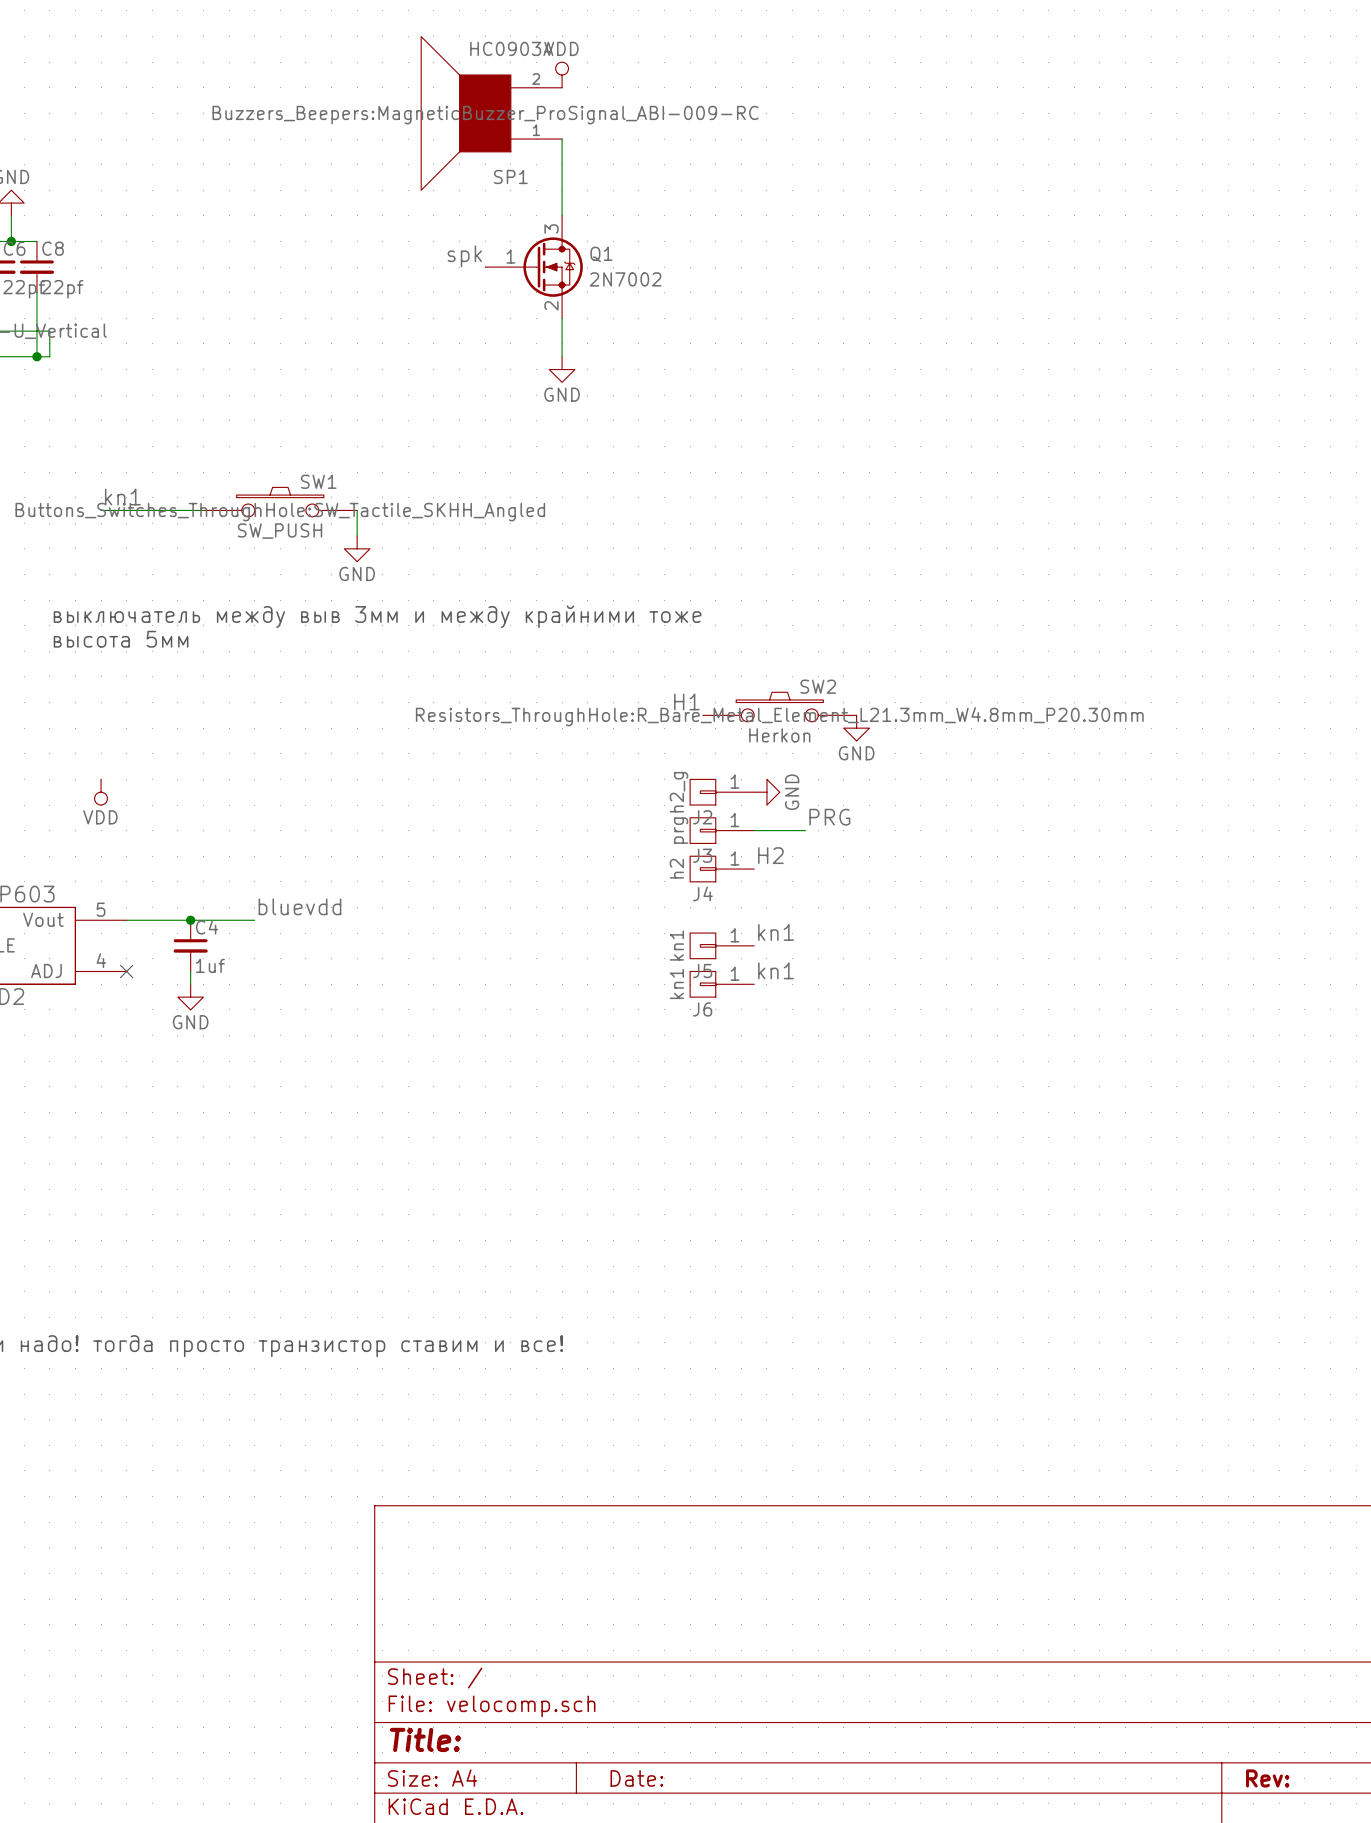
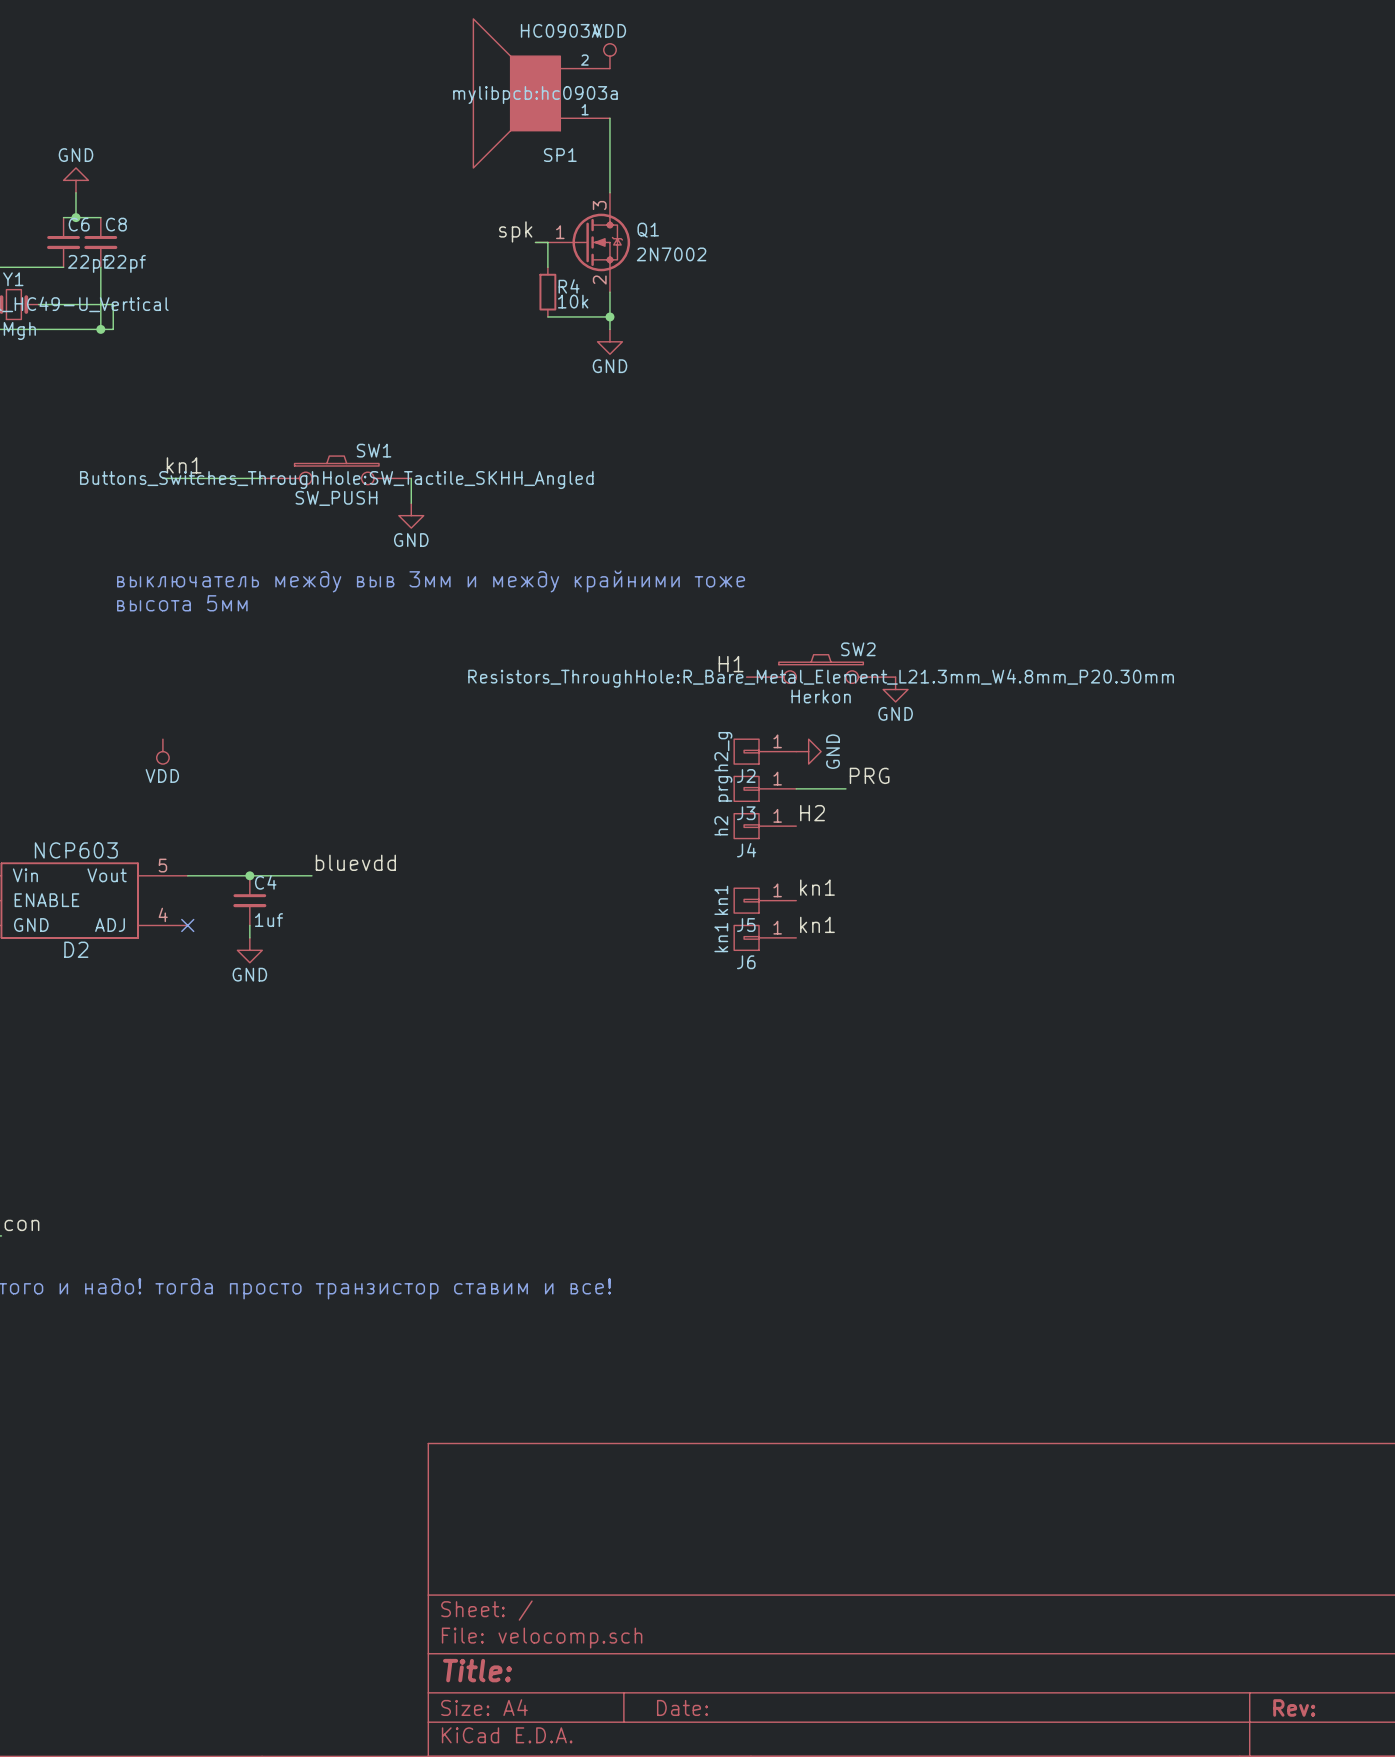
SP1 text: Buzzers_Beepers:MagneticBuzzer_ProSignal_ABI-009-RC (485, 115) -> mylibpcb:hc0903a (535, 95)
wire: none -> (535, 242) (547, 242) (547, 267)
R4: none -> 10k (547, 292)
wire: none -> (547, 316) (609, 316)
junction: none -> (609, 316)

